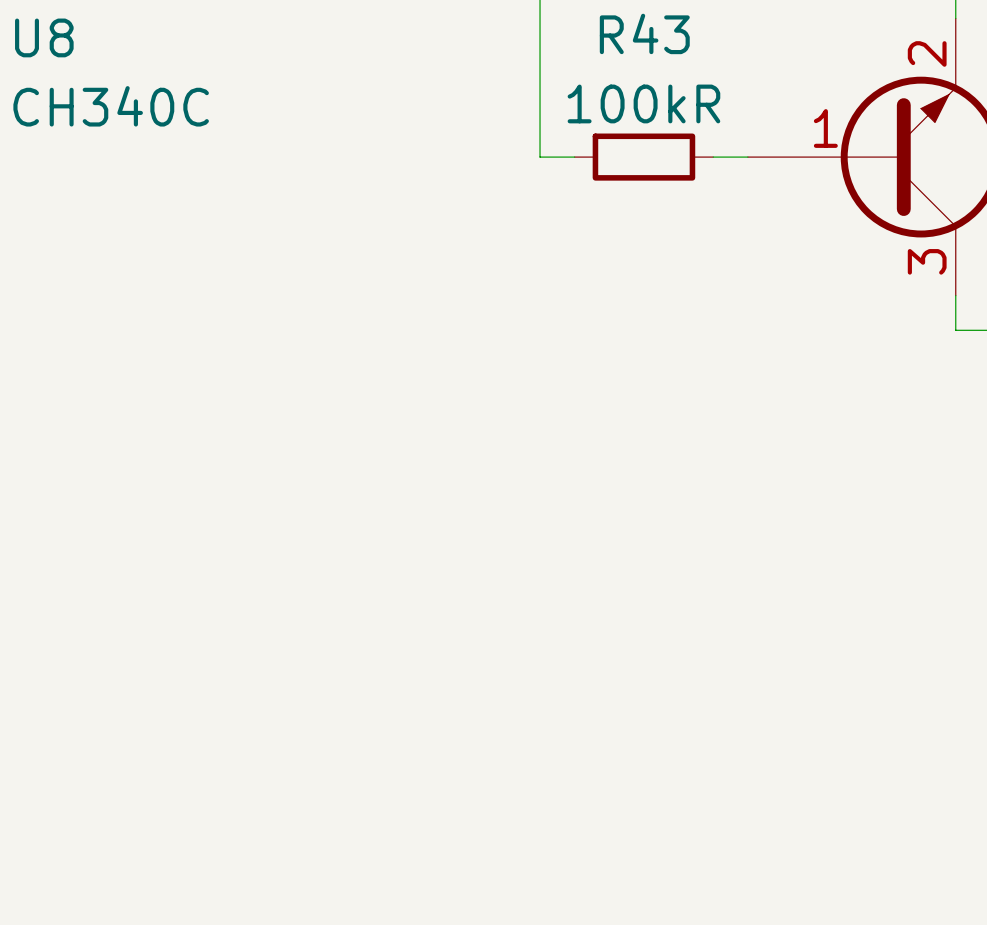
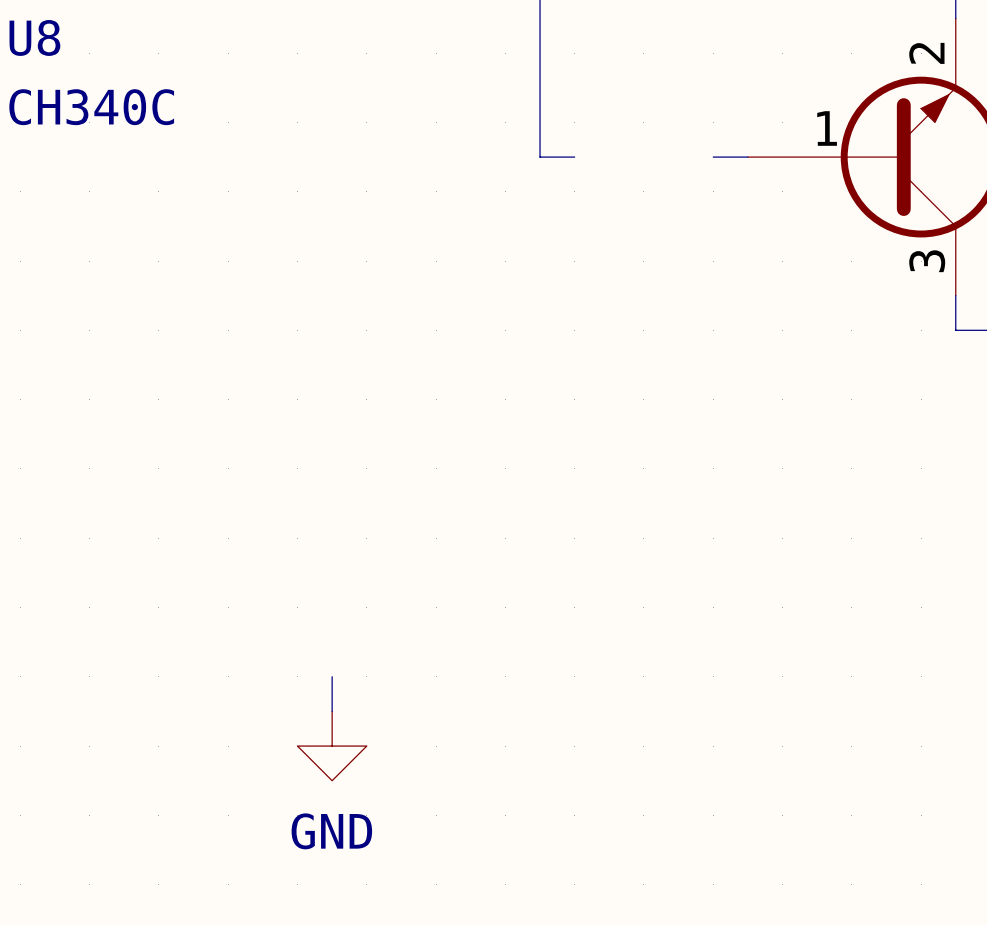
R43: 100kR (643, 157) -> none
wire: none -> (332, 676) (332, 711)
power symbol: none -> GND (332, 746)

